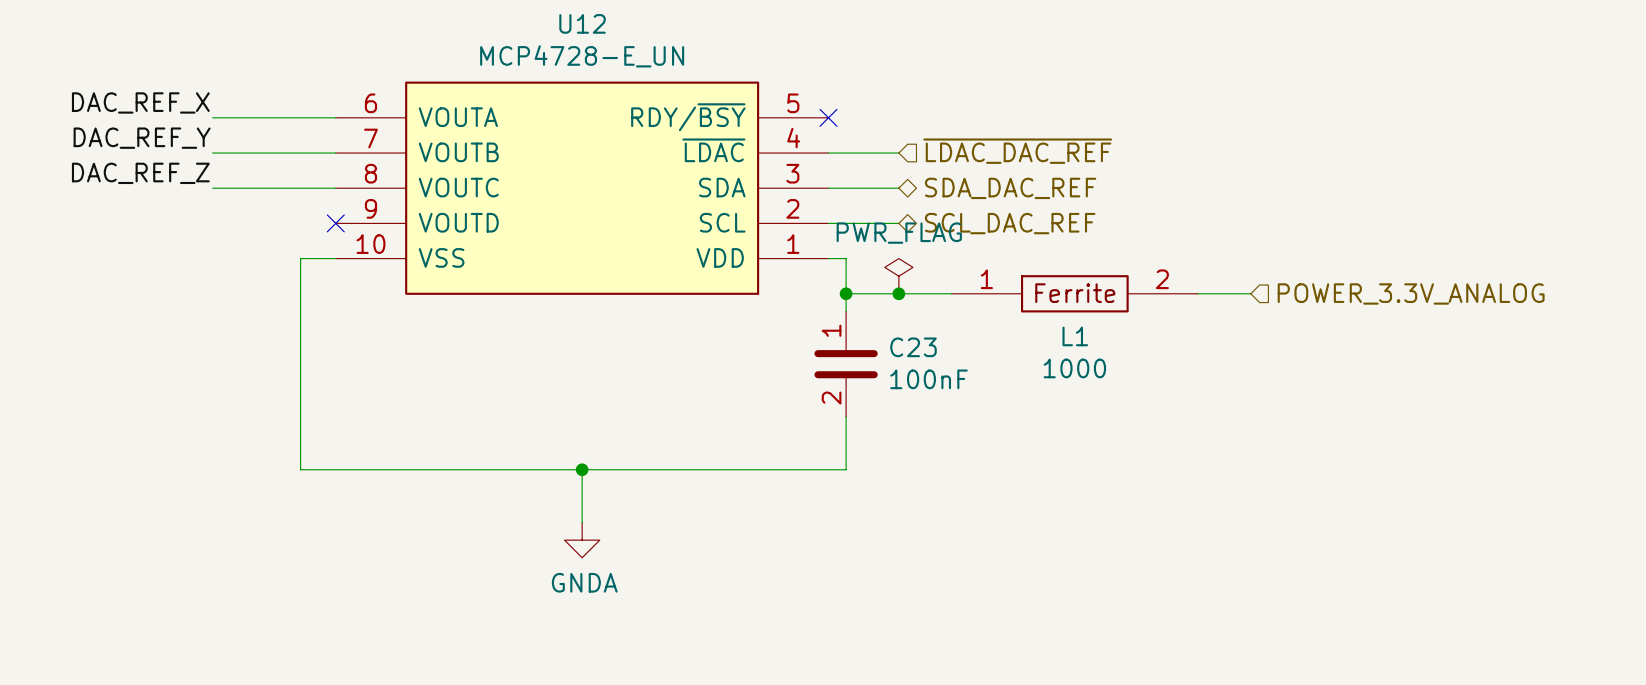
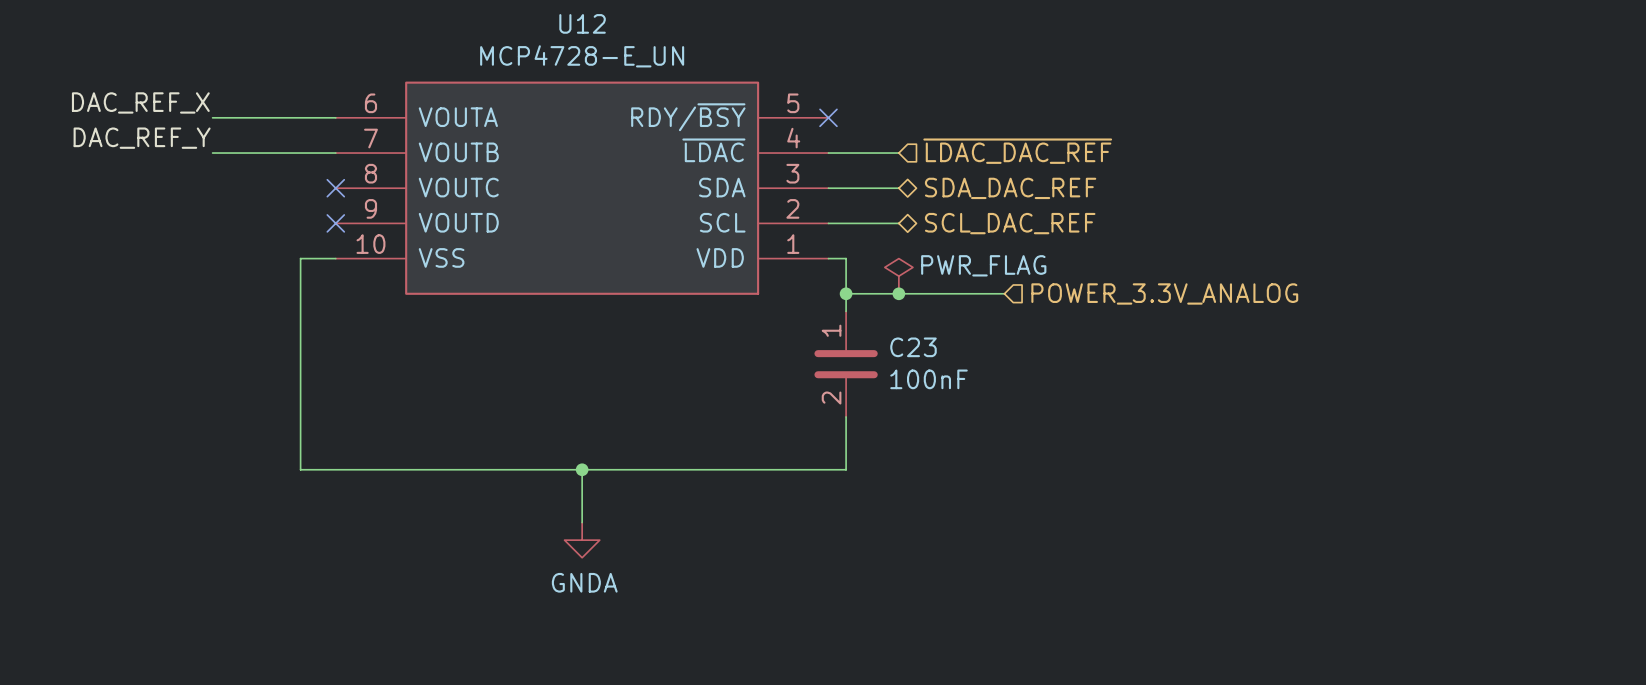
label: DAC_REF_Z (140, 173) -> none
wire: (212, 188) (335, 188) -> none
no-connect mark: none -> (335, 188)
power symbol text position: PWR_FLAG (899, 233) -> PWR_FLAG (983, 265)
L1: (1074, 293) -> none
hierarchical label position: POWER_3.3V_ANALOG (1411, 293) -> POWER_3.3V_ANALOG (1164, 293)

